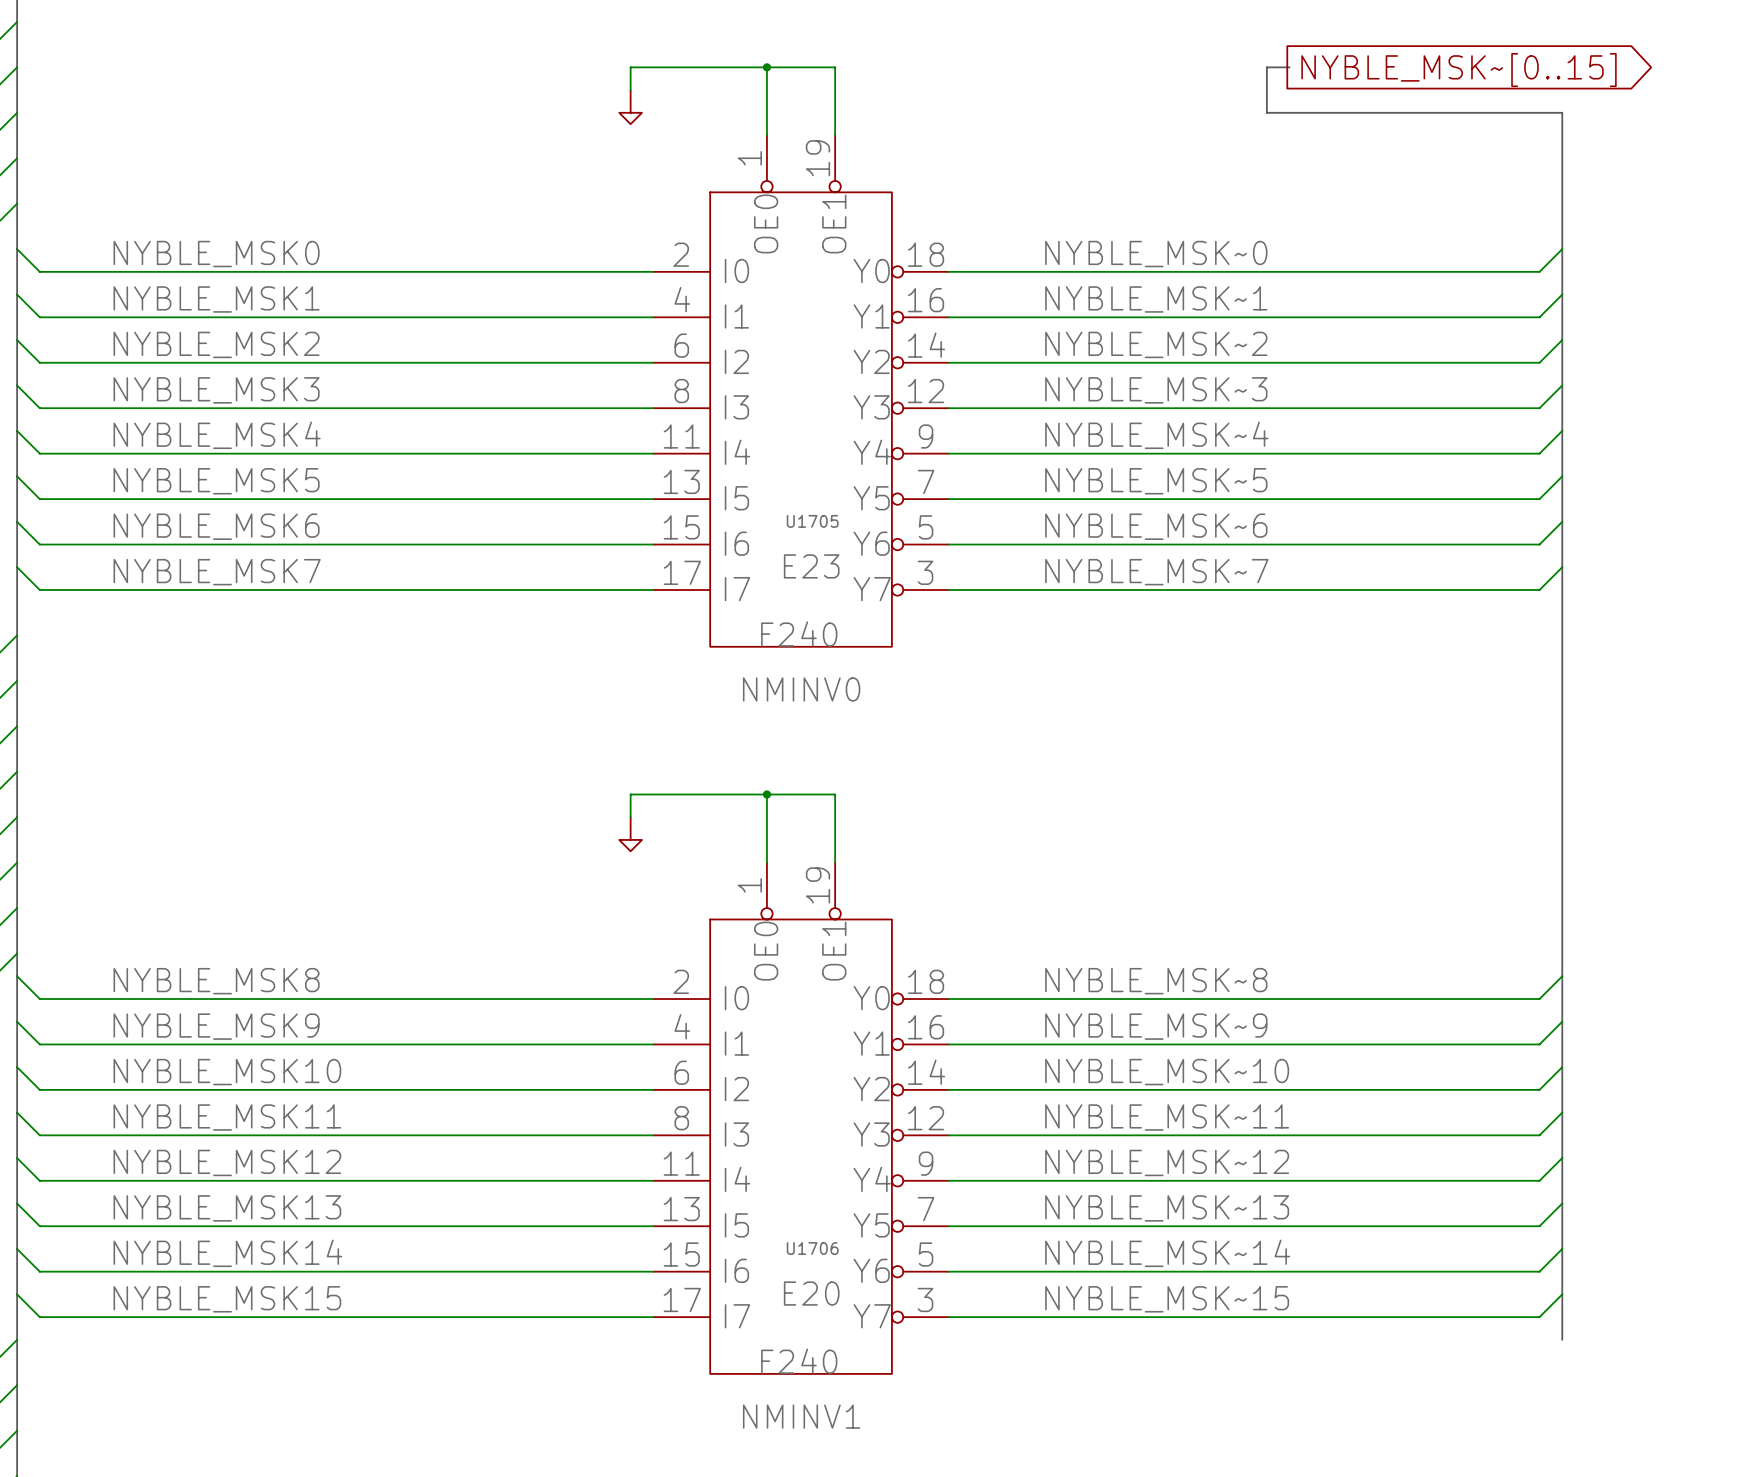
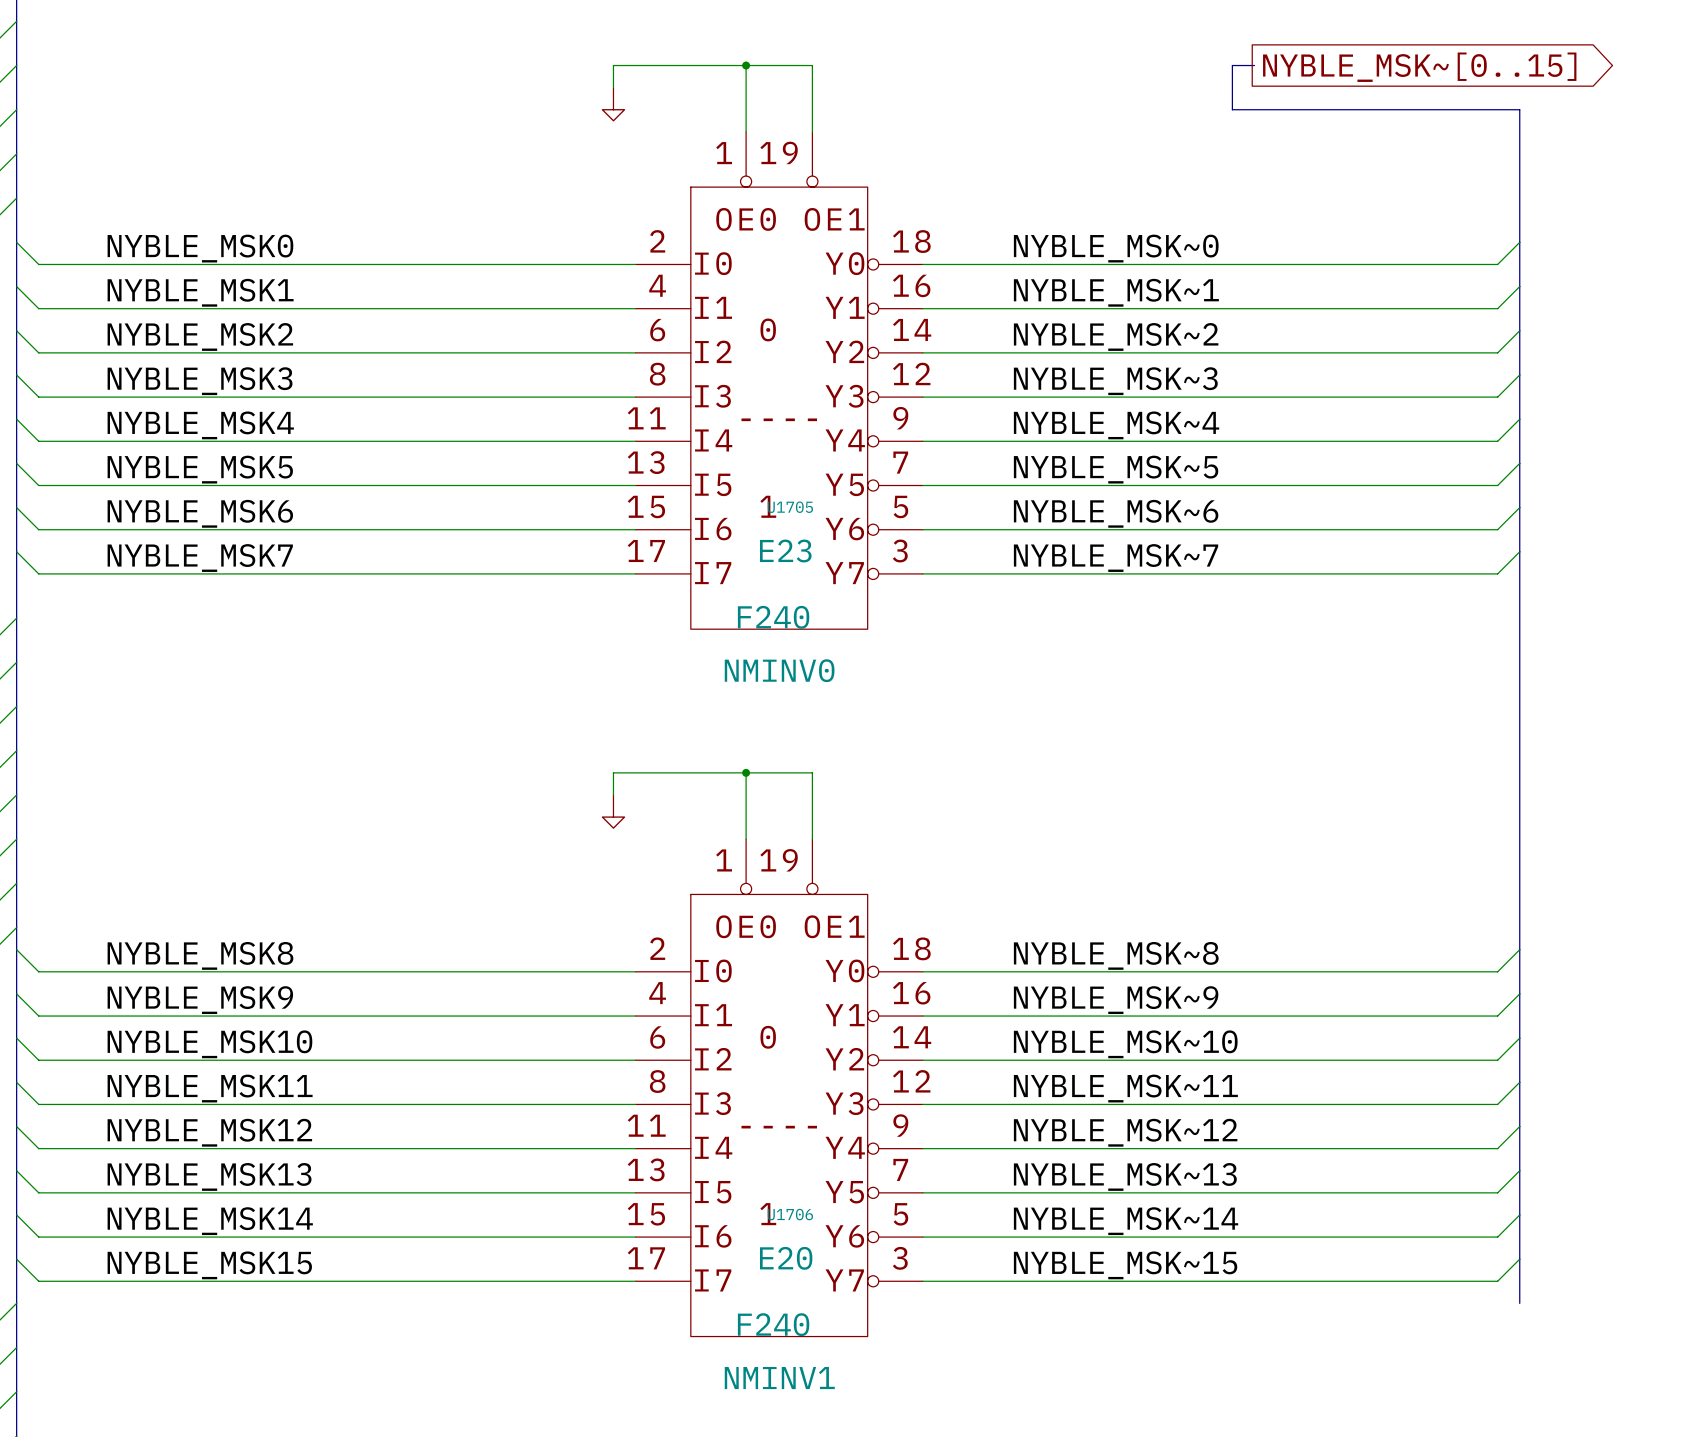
U1705 symbol: [653, 135, 949, 647] -> [635, 131, 923, 630]
U1706 symbol: [653, 862, 949, 1374] -> [635, 839, 923, 1337]

